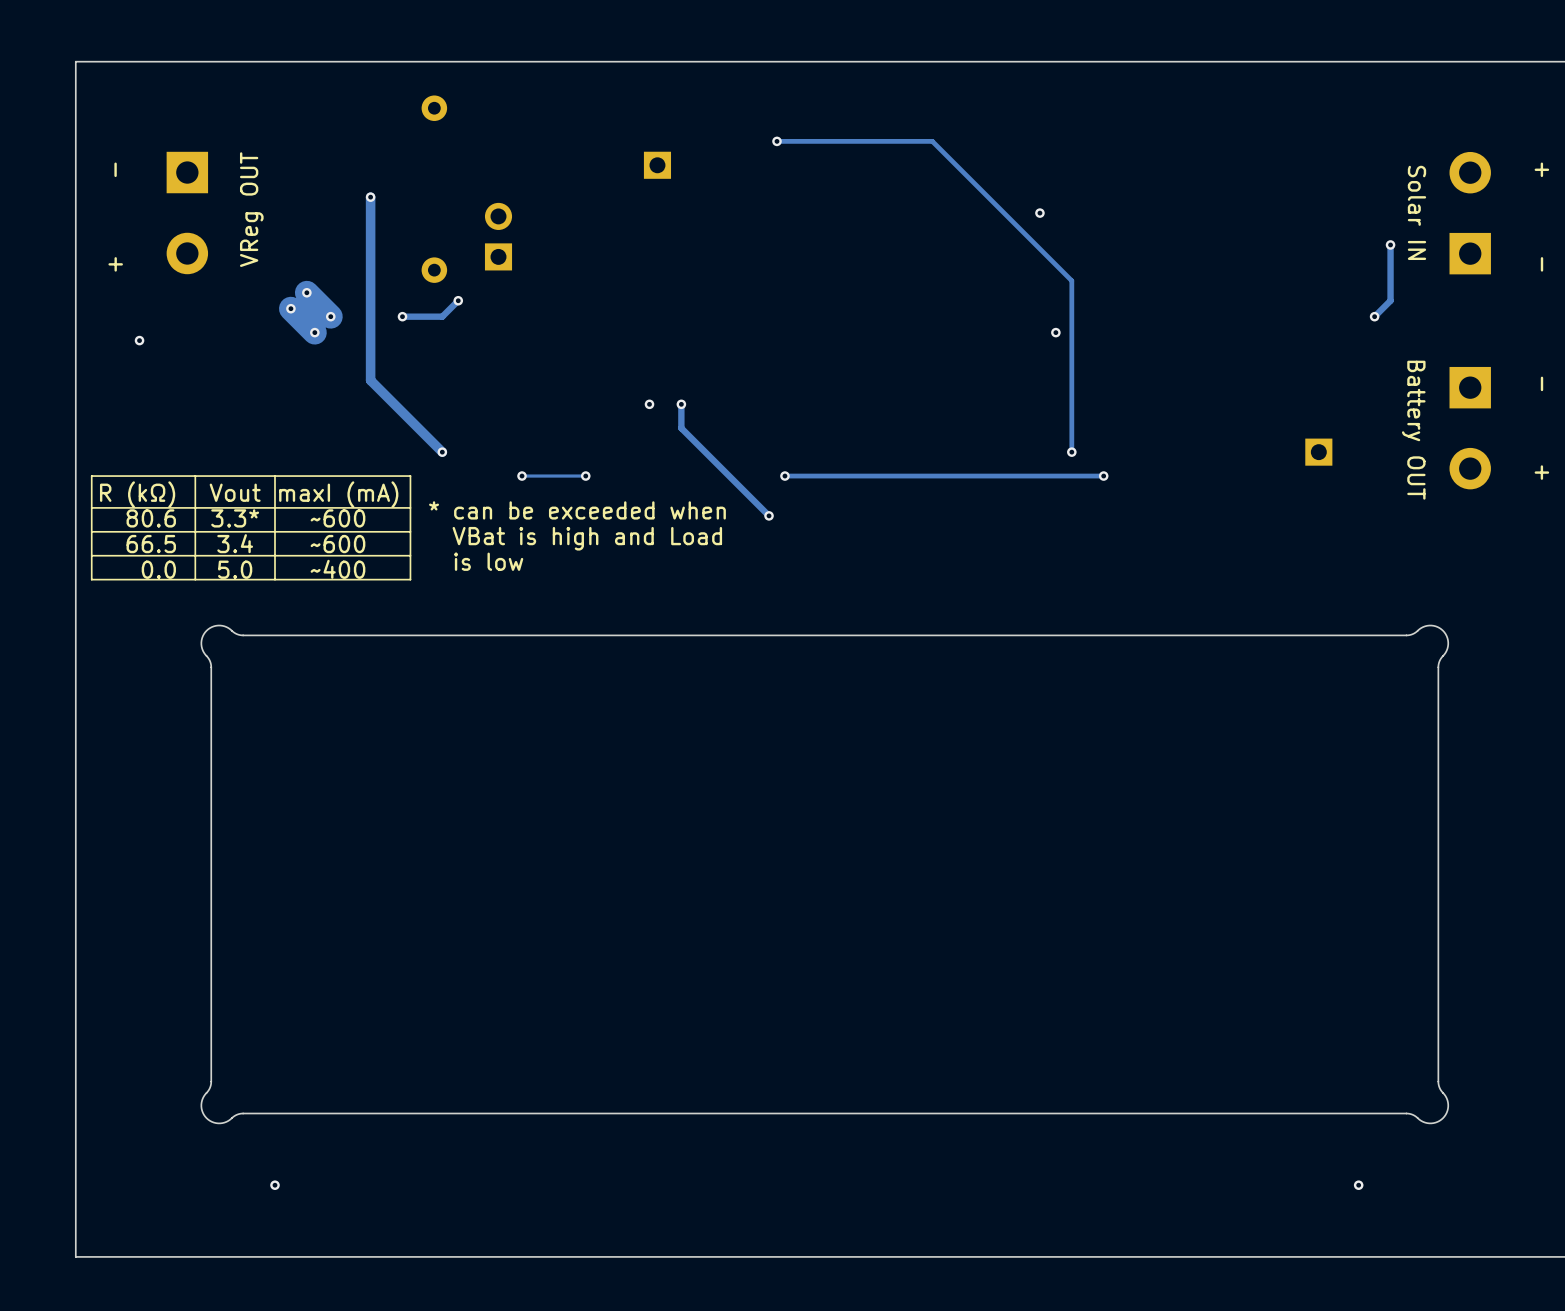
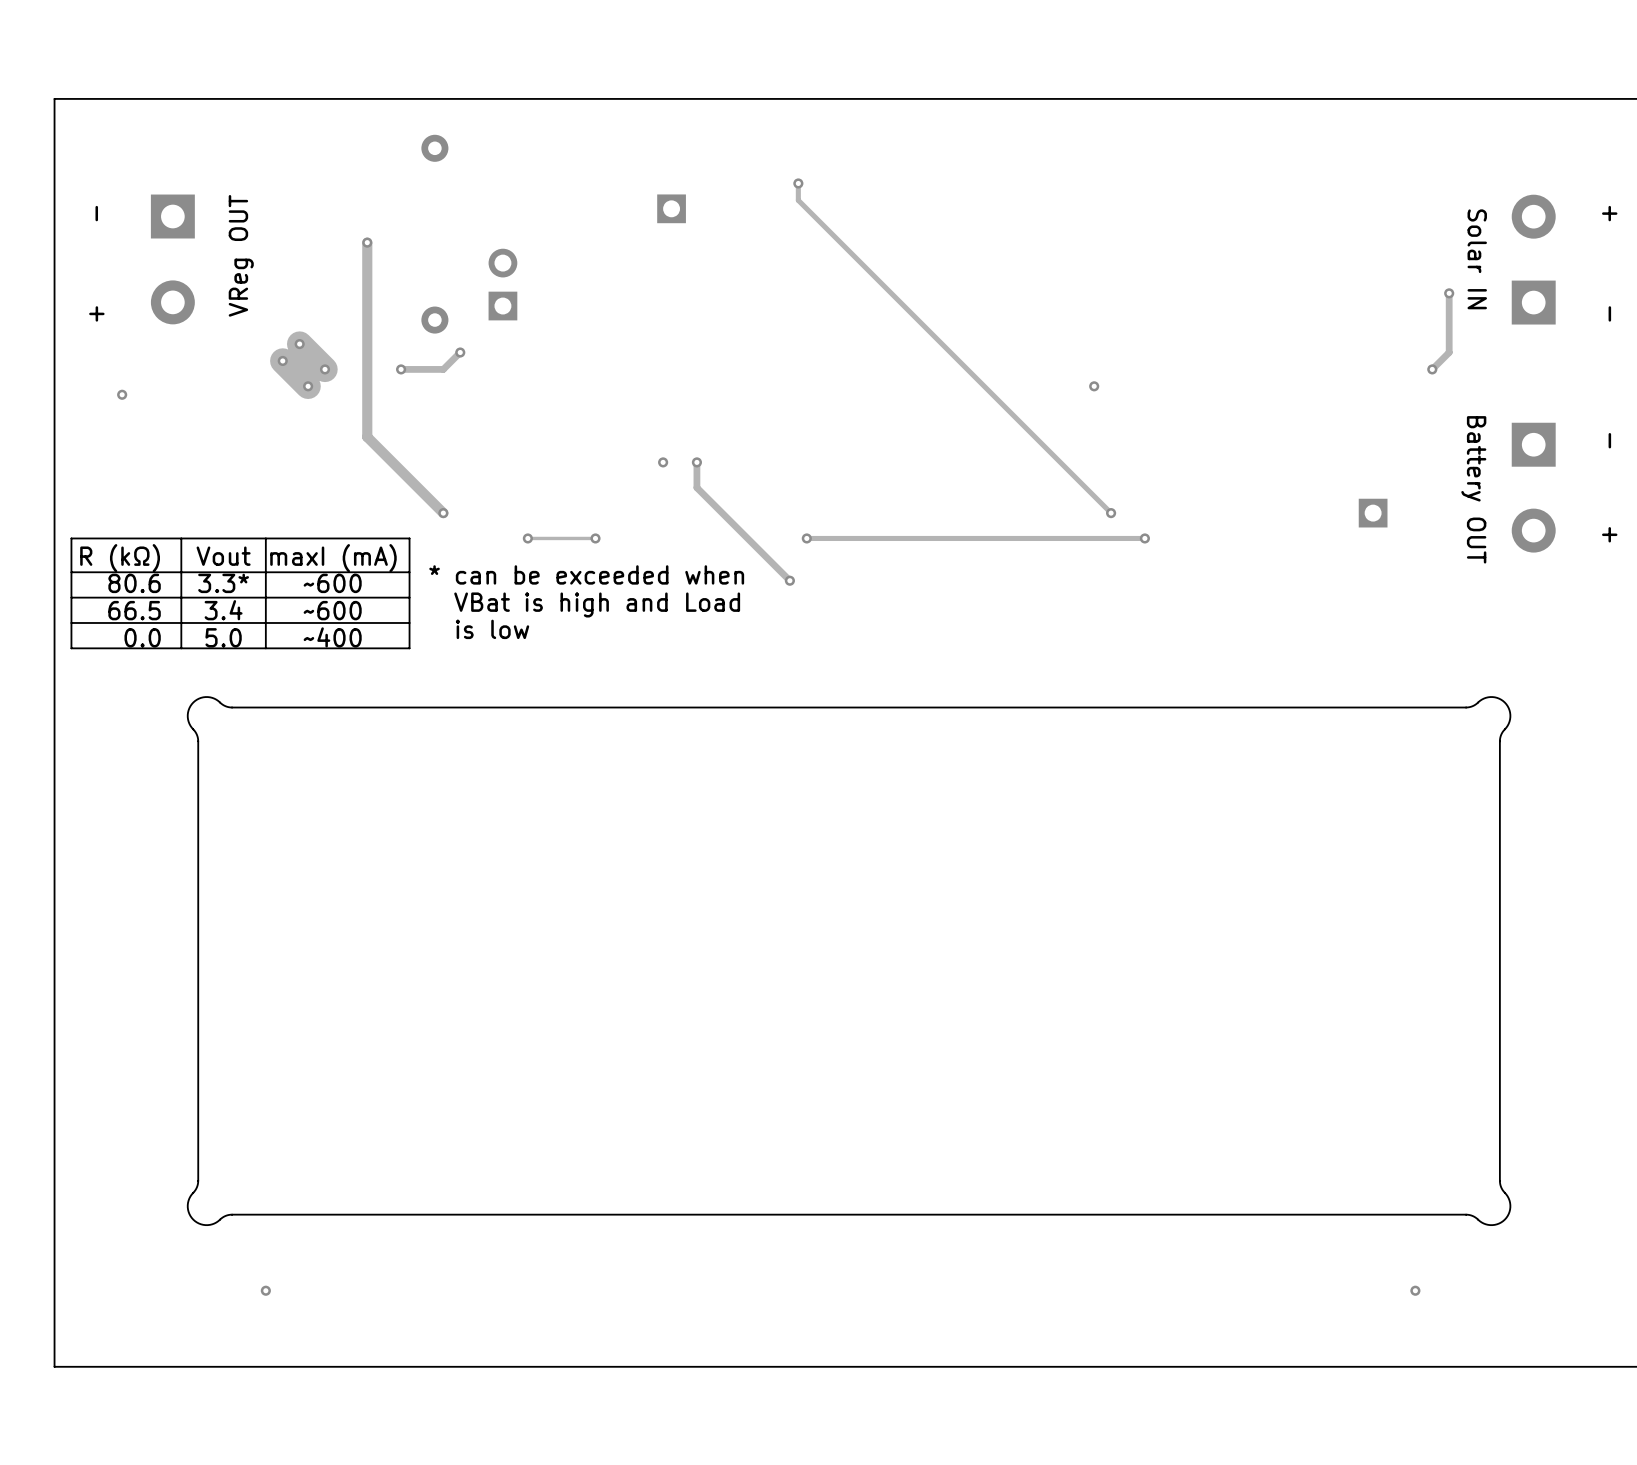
track: (776, 141) (932, 141) (1071, 280) (1071, 452) -> (798, 183) (798, 200) (1111, 513)
via: (1039, 213) -> none

